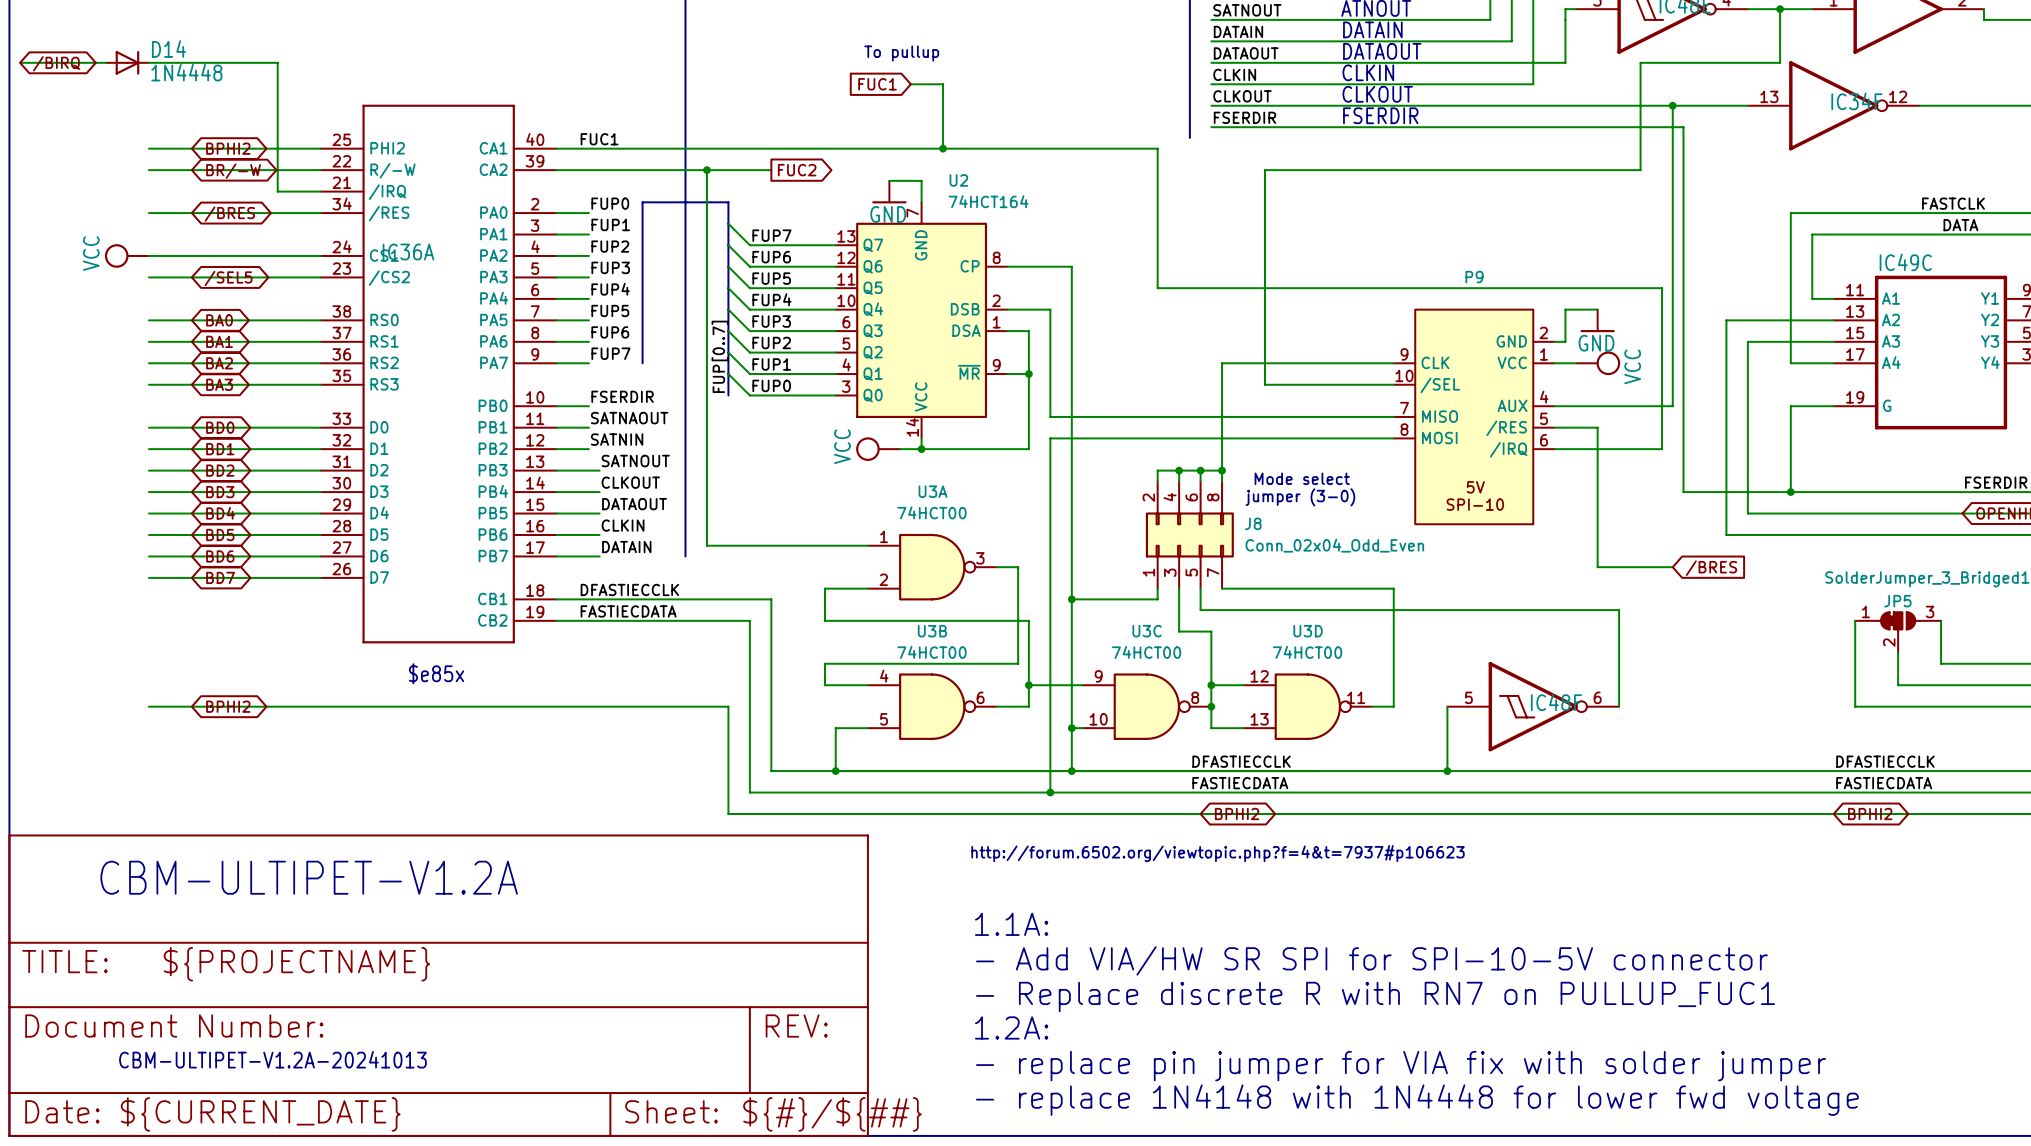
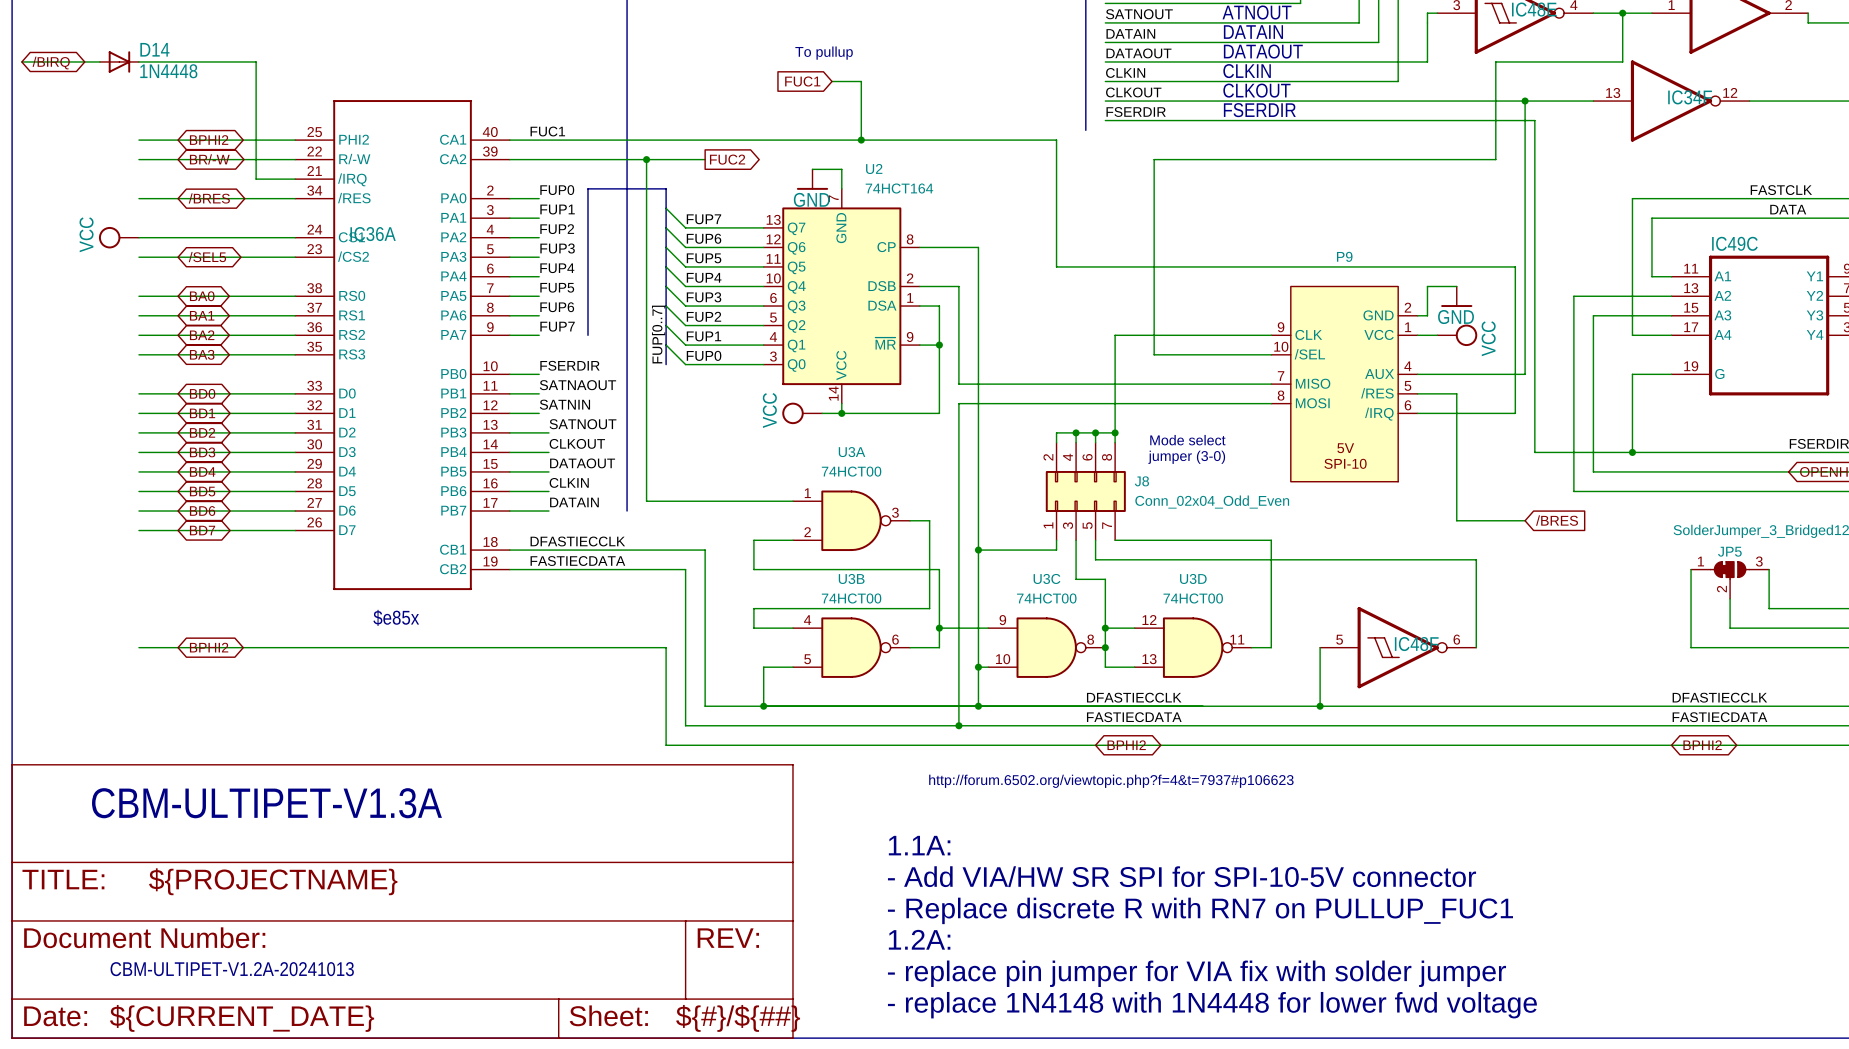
text: CBM-ULTIPET-V1.2A (309, 877) -> CBM-ULTIPET-V1.3A (266, 803)

